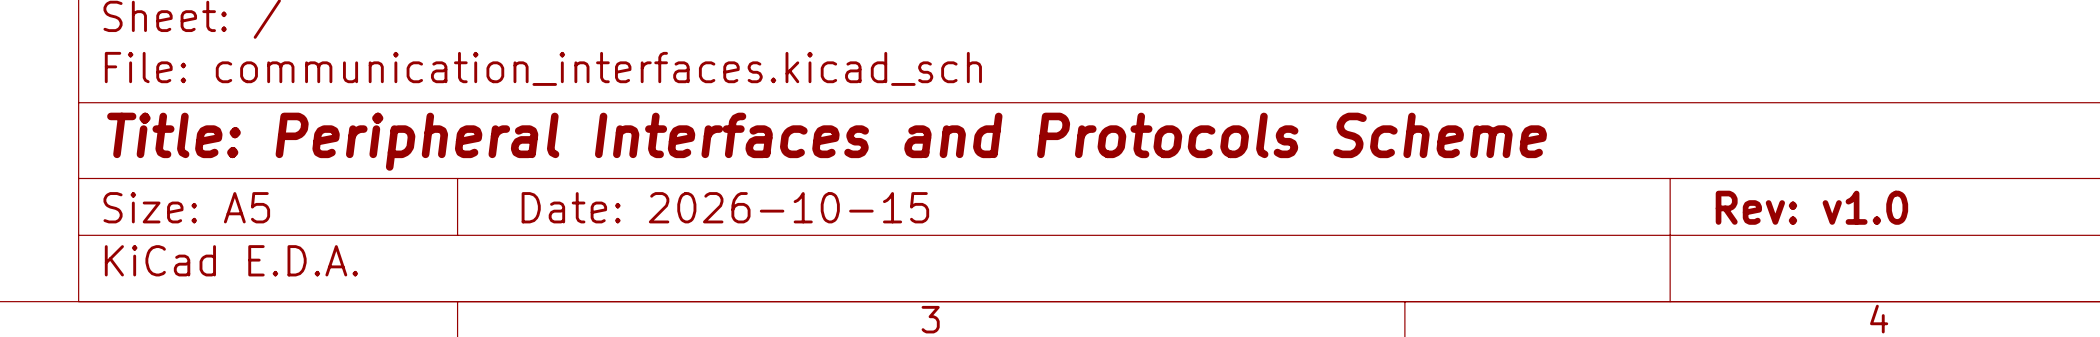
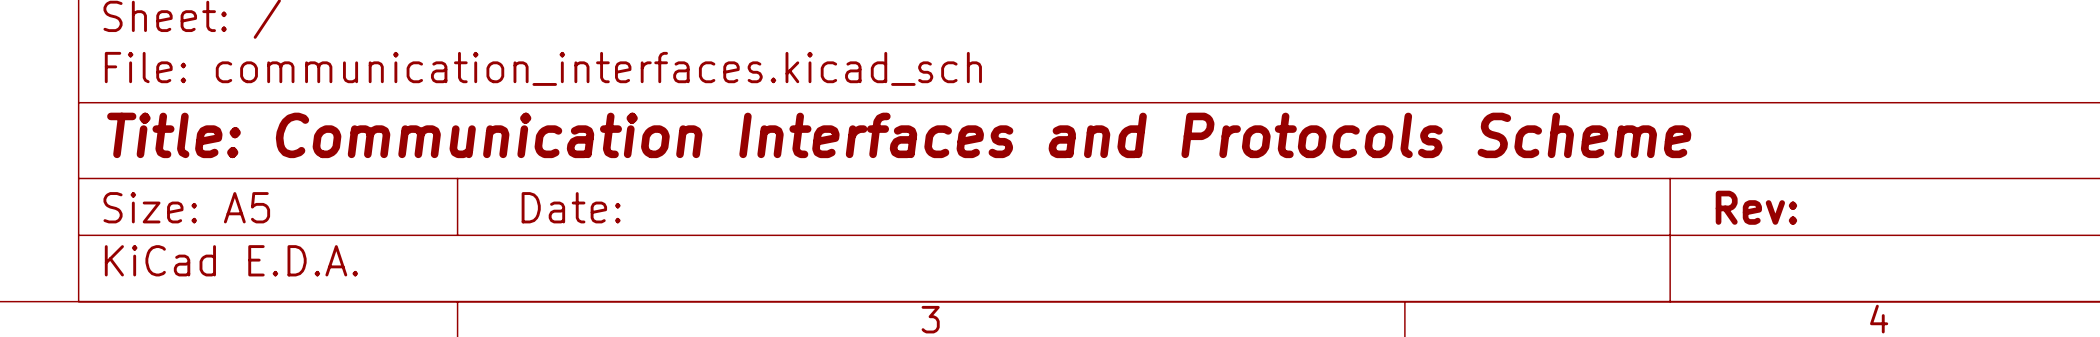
title block: Title: Peripheral Interfaces and Protocols Scheme (827, 141) -> Title: Communication Interfaces and Protocols Scheme (899, 135)
title block: Date: 2026-10-15 (725, 207) -> Date: (571, 207)
title block: Rev: v1.0 (1811, 207) -> Rev: (1756, 207)

